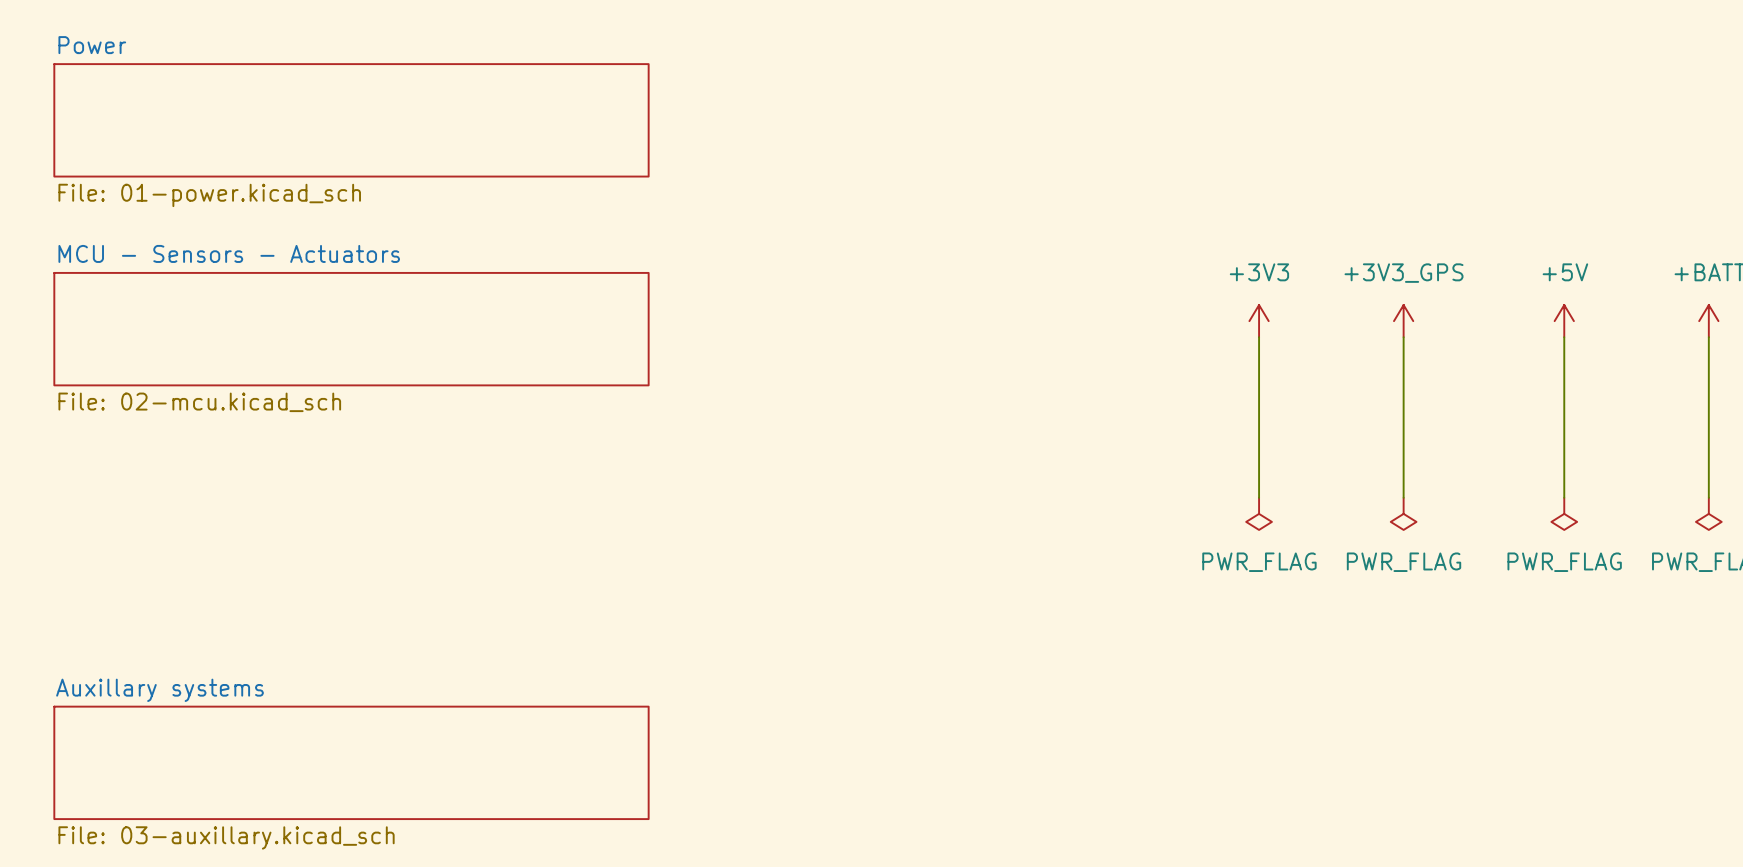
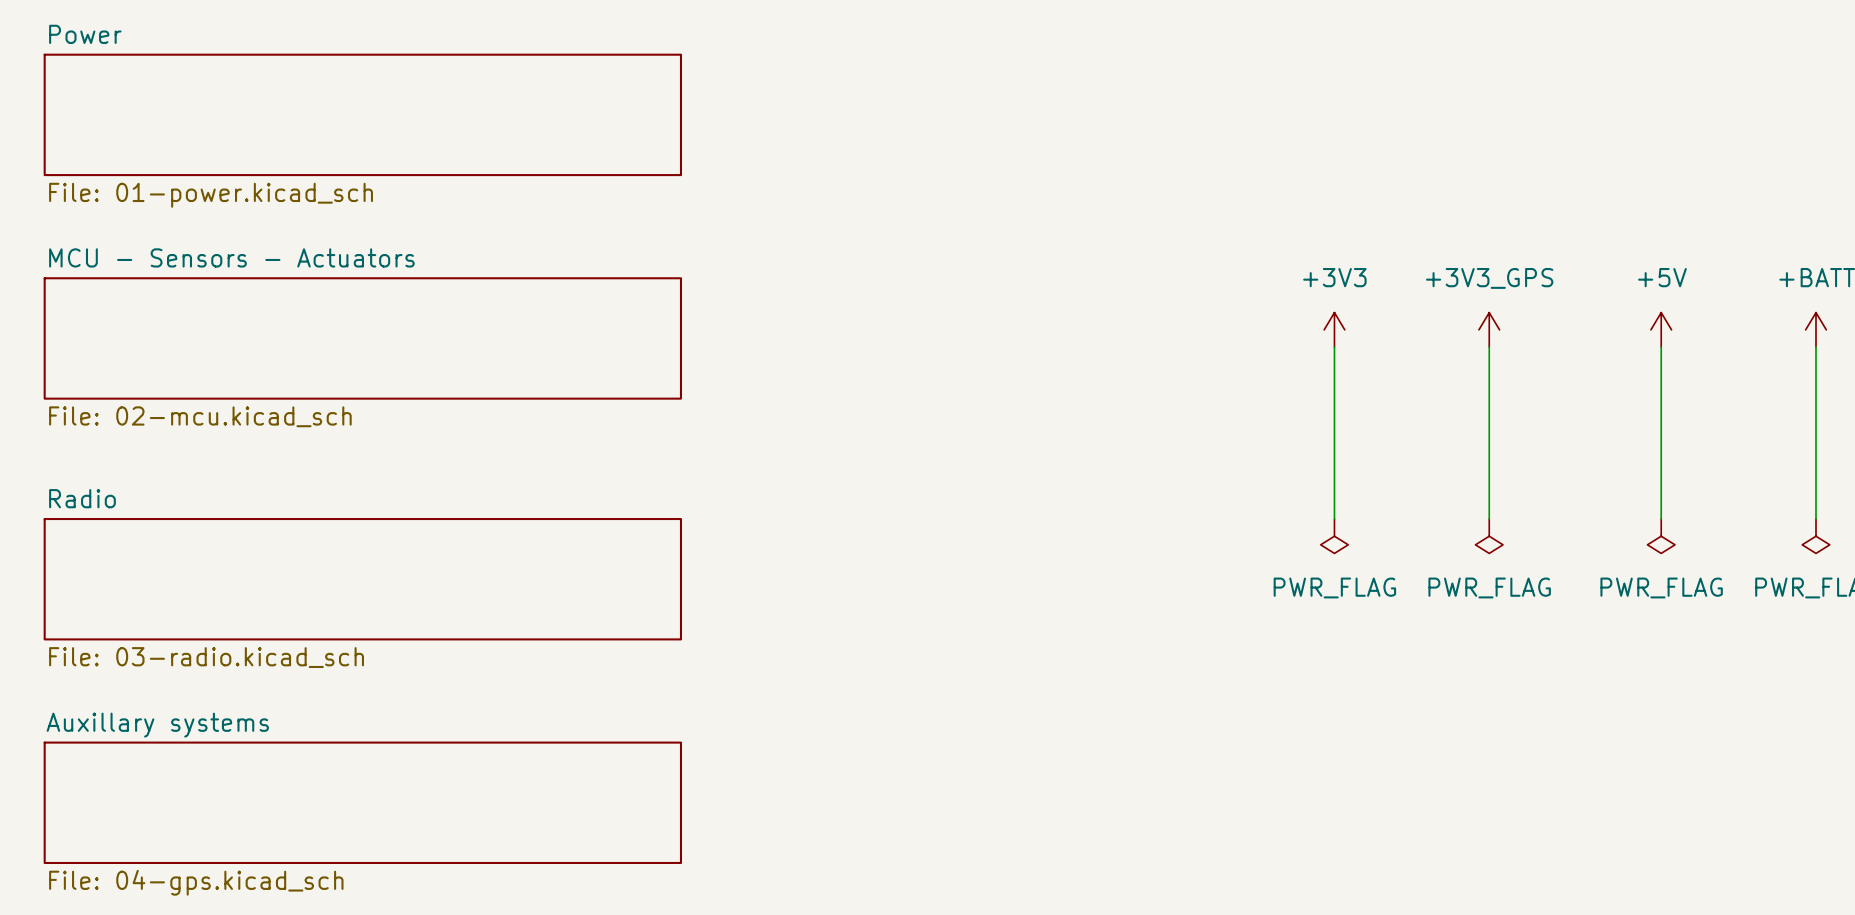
sheet Radio: none -> File: 03-radio.kicad_sch (362, 579)
sheet Auxillary systems value: File: 03-auxillary.kicad_sch (226, 837) -> File: 04-gps.kicad_sch (196, 882)

